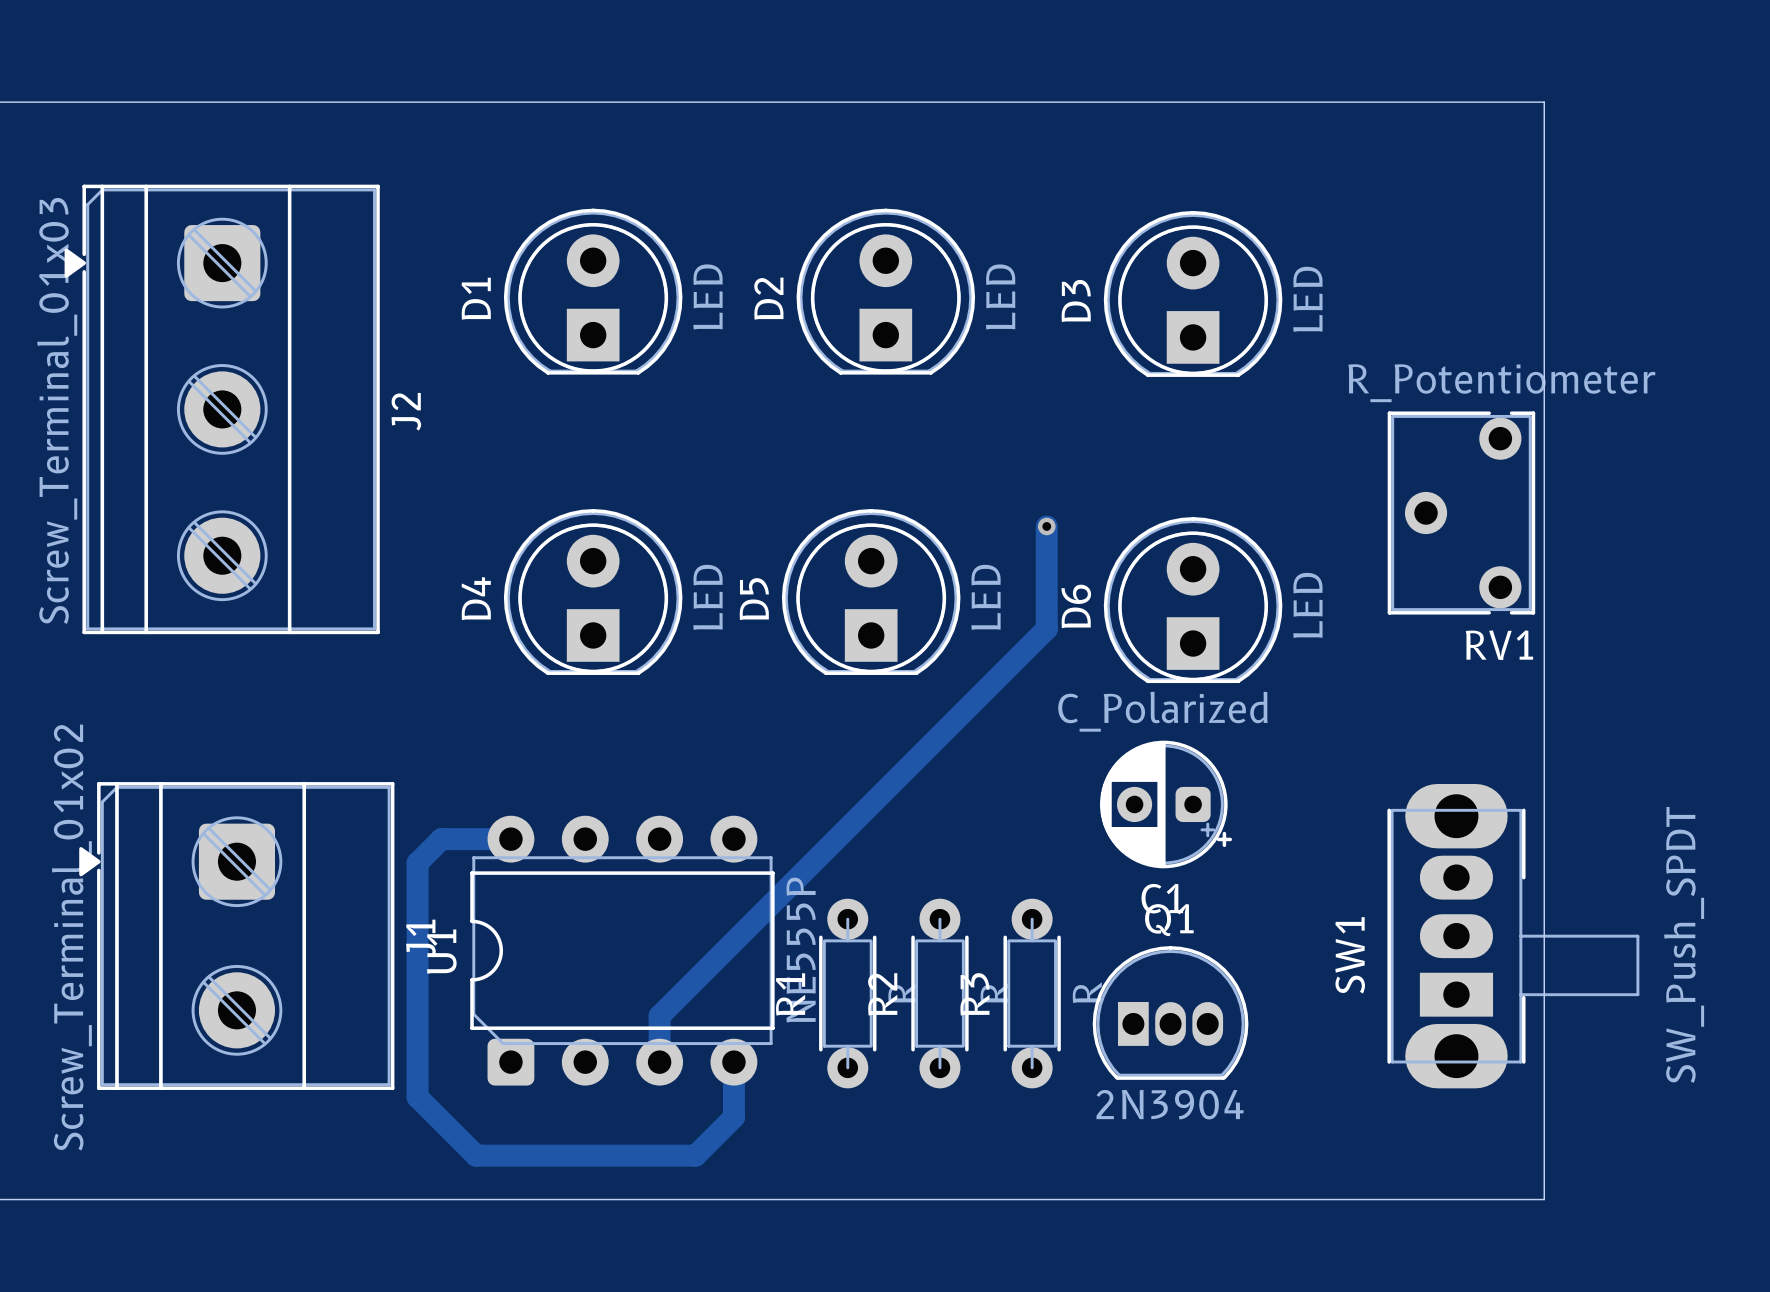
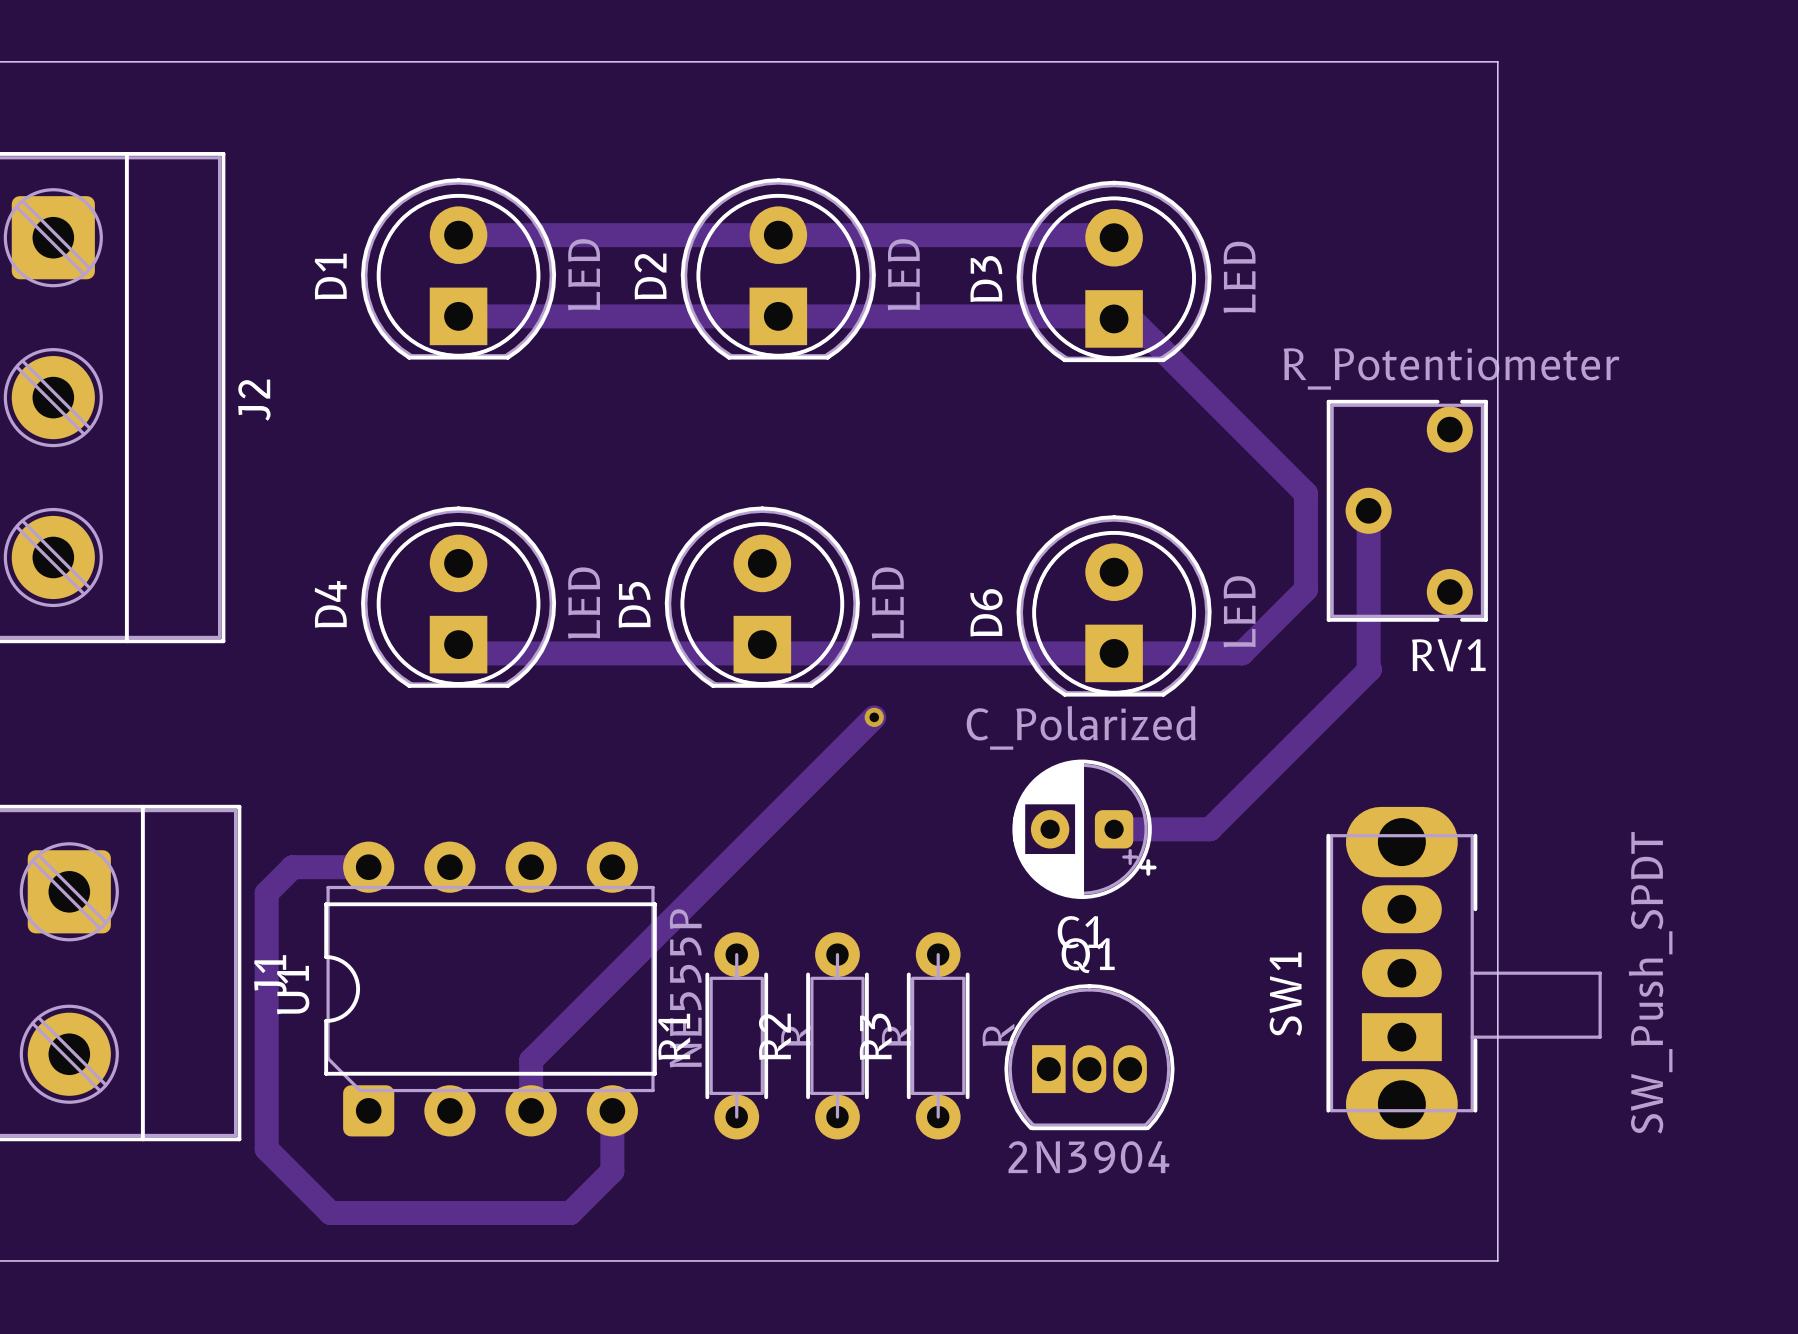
track: none -> (458, 235) (1111, 235) (1114, 237)
track: none -> (458, 316) (1111, 316) (1114, 318) (1131, 318) (1305, 493) (1305, 589) (1241, 653) (467, 653) (458, 644)
track: none -> (1368, 510) (1369, 669) (1210, 829) (1114, 829)
track: (1046, 526) (1046, 628) (973, 702) -> none
via: (1046, 526) -> none
via: none -> (874, 717)

